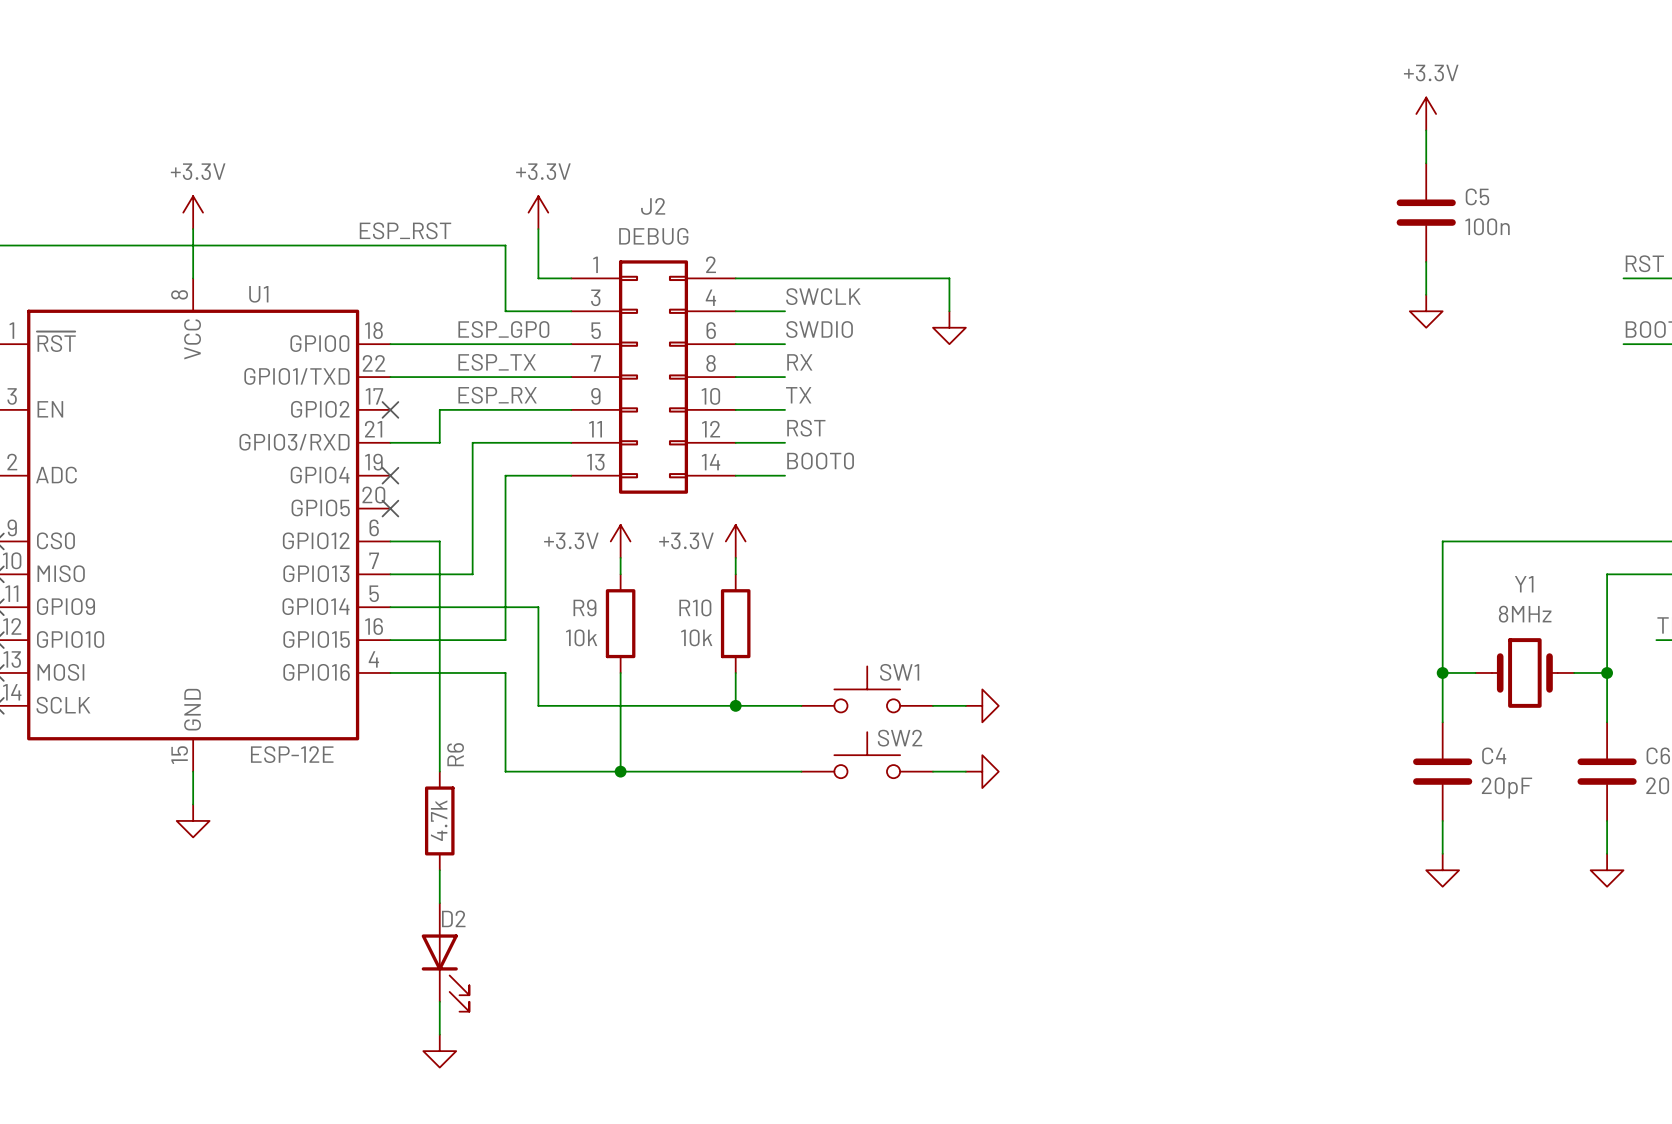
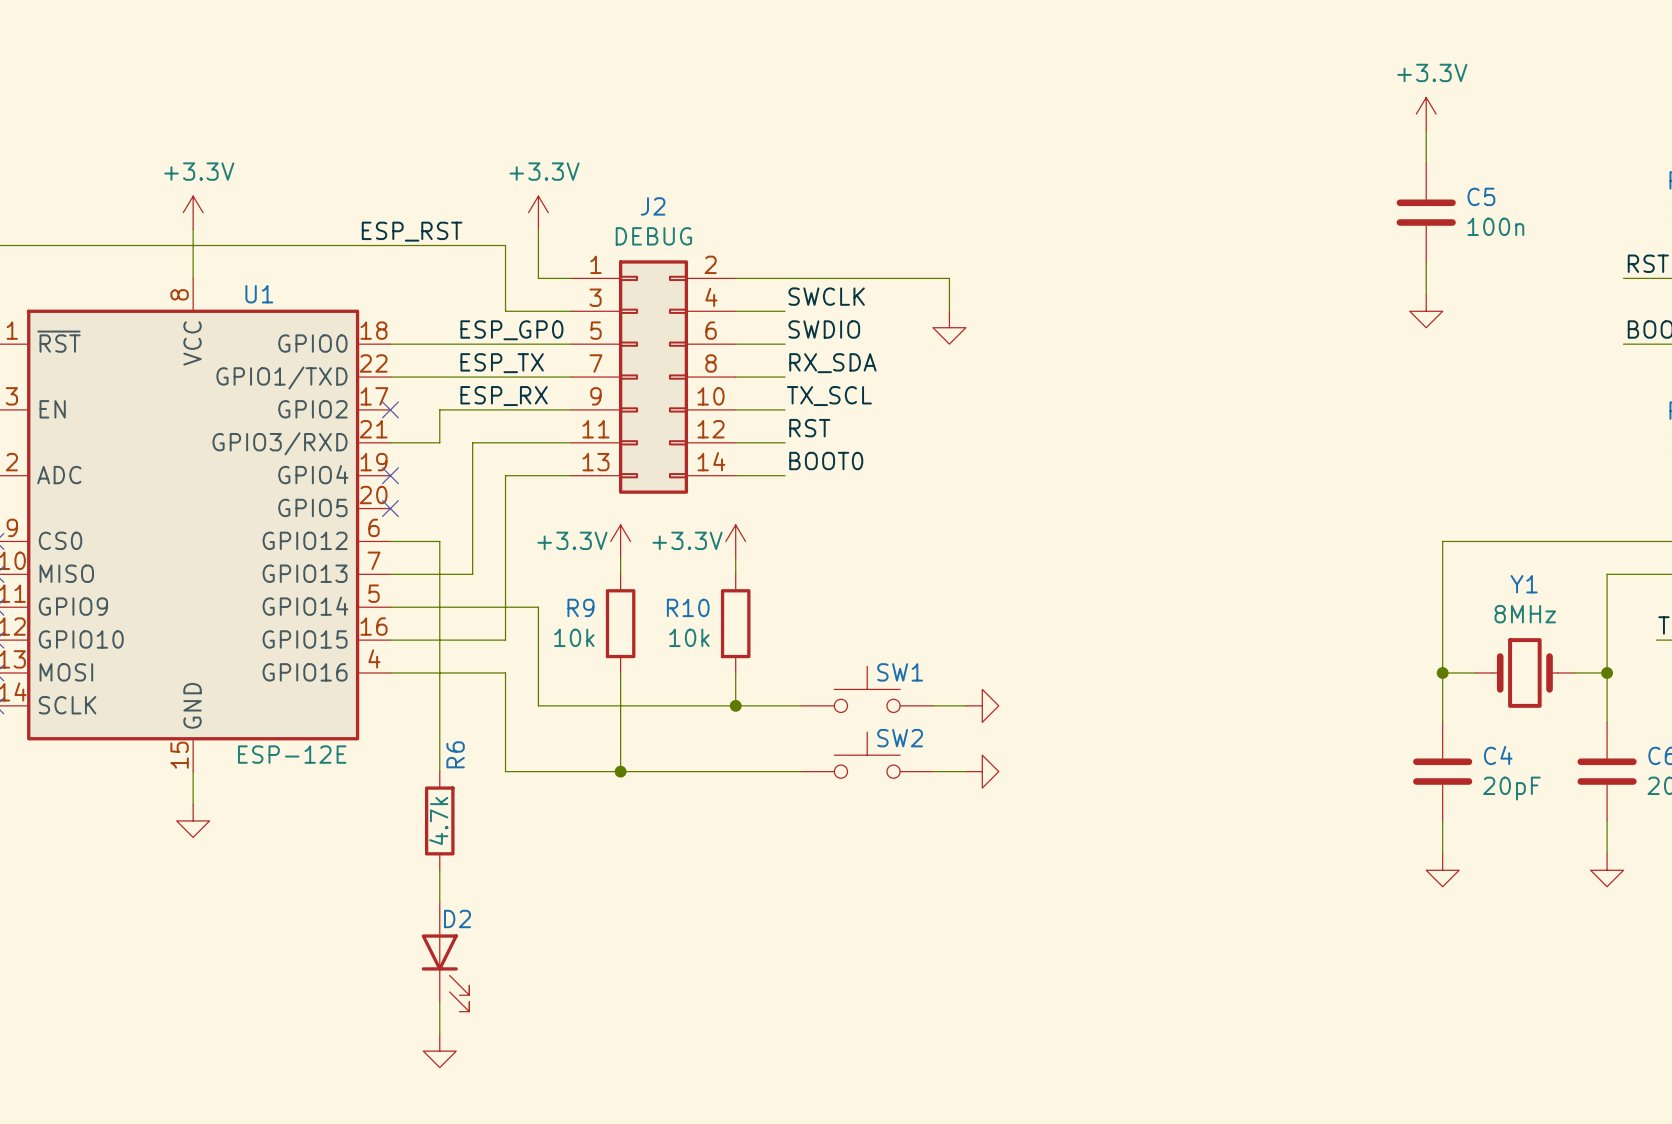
label: RX (799, 362) -> RX_SDA (832, 363)
label: TX (798, 395) -> TX_SCL (829, 396)

